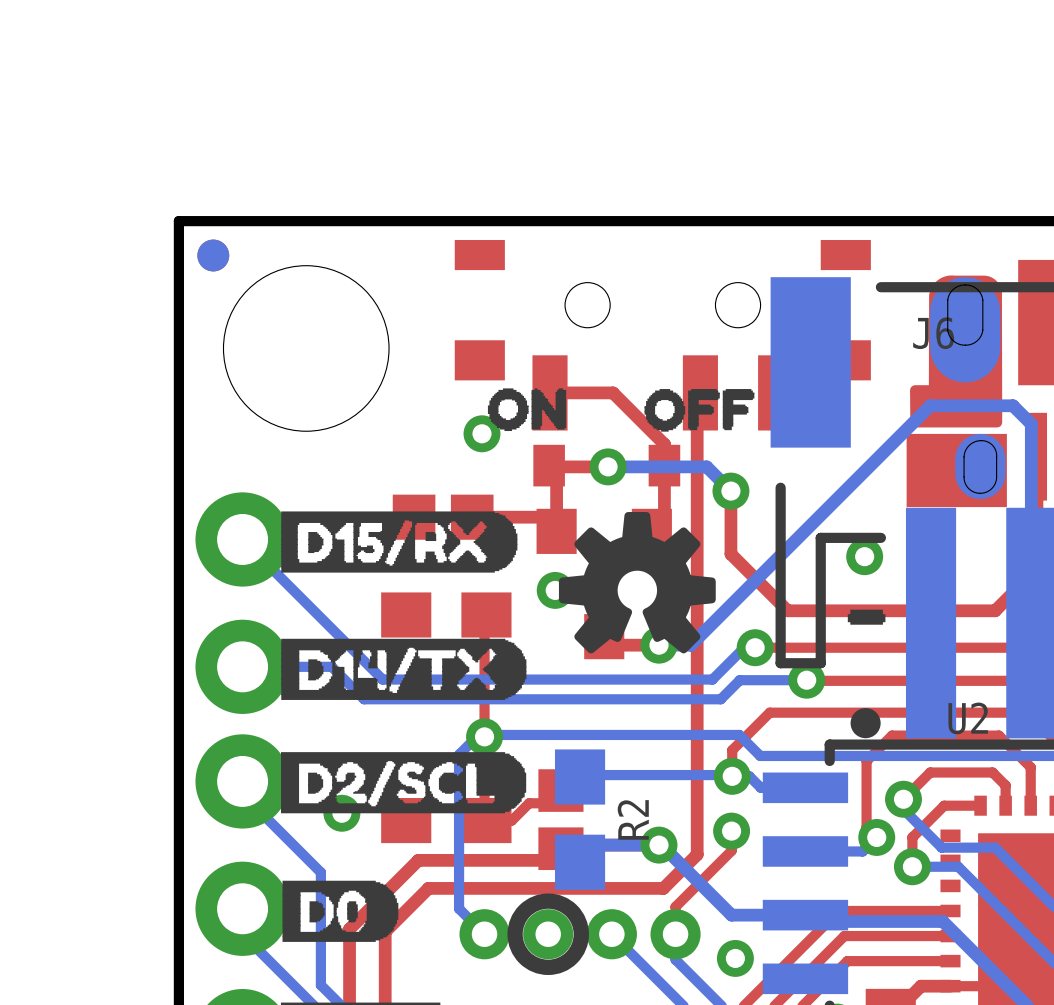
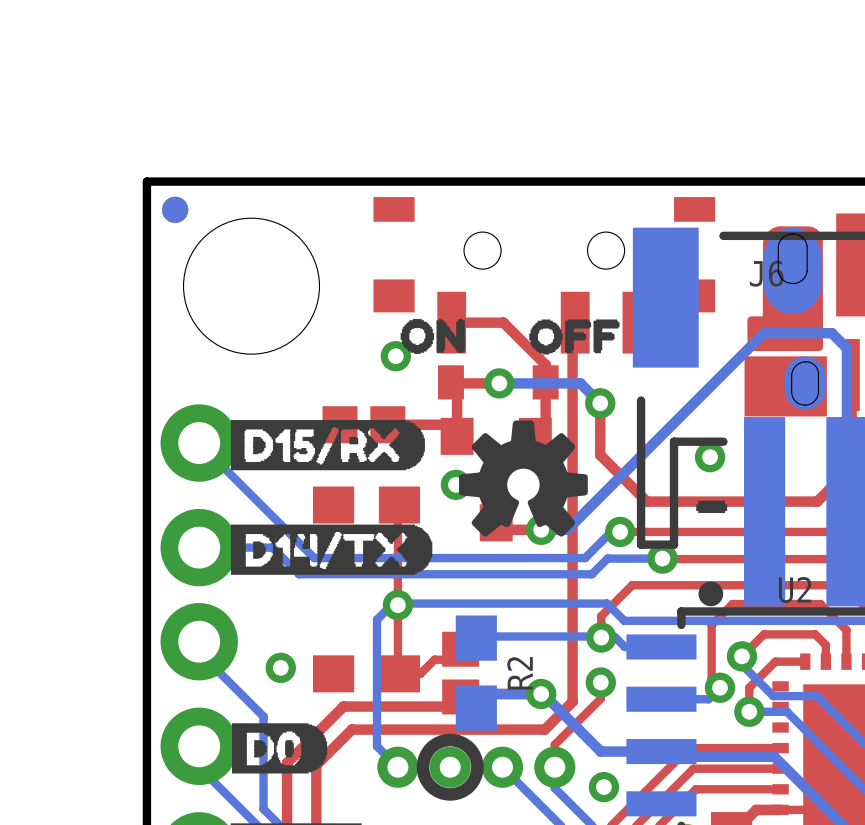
drawing: [281, 752, 527, 814] -> none

